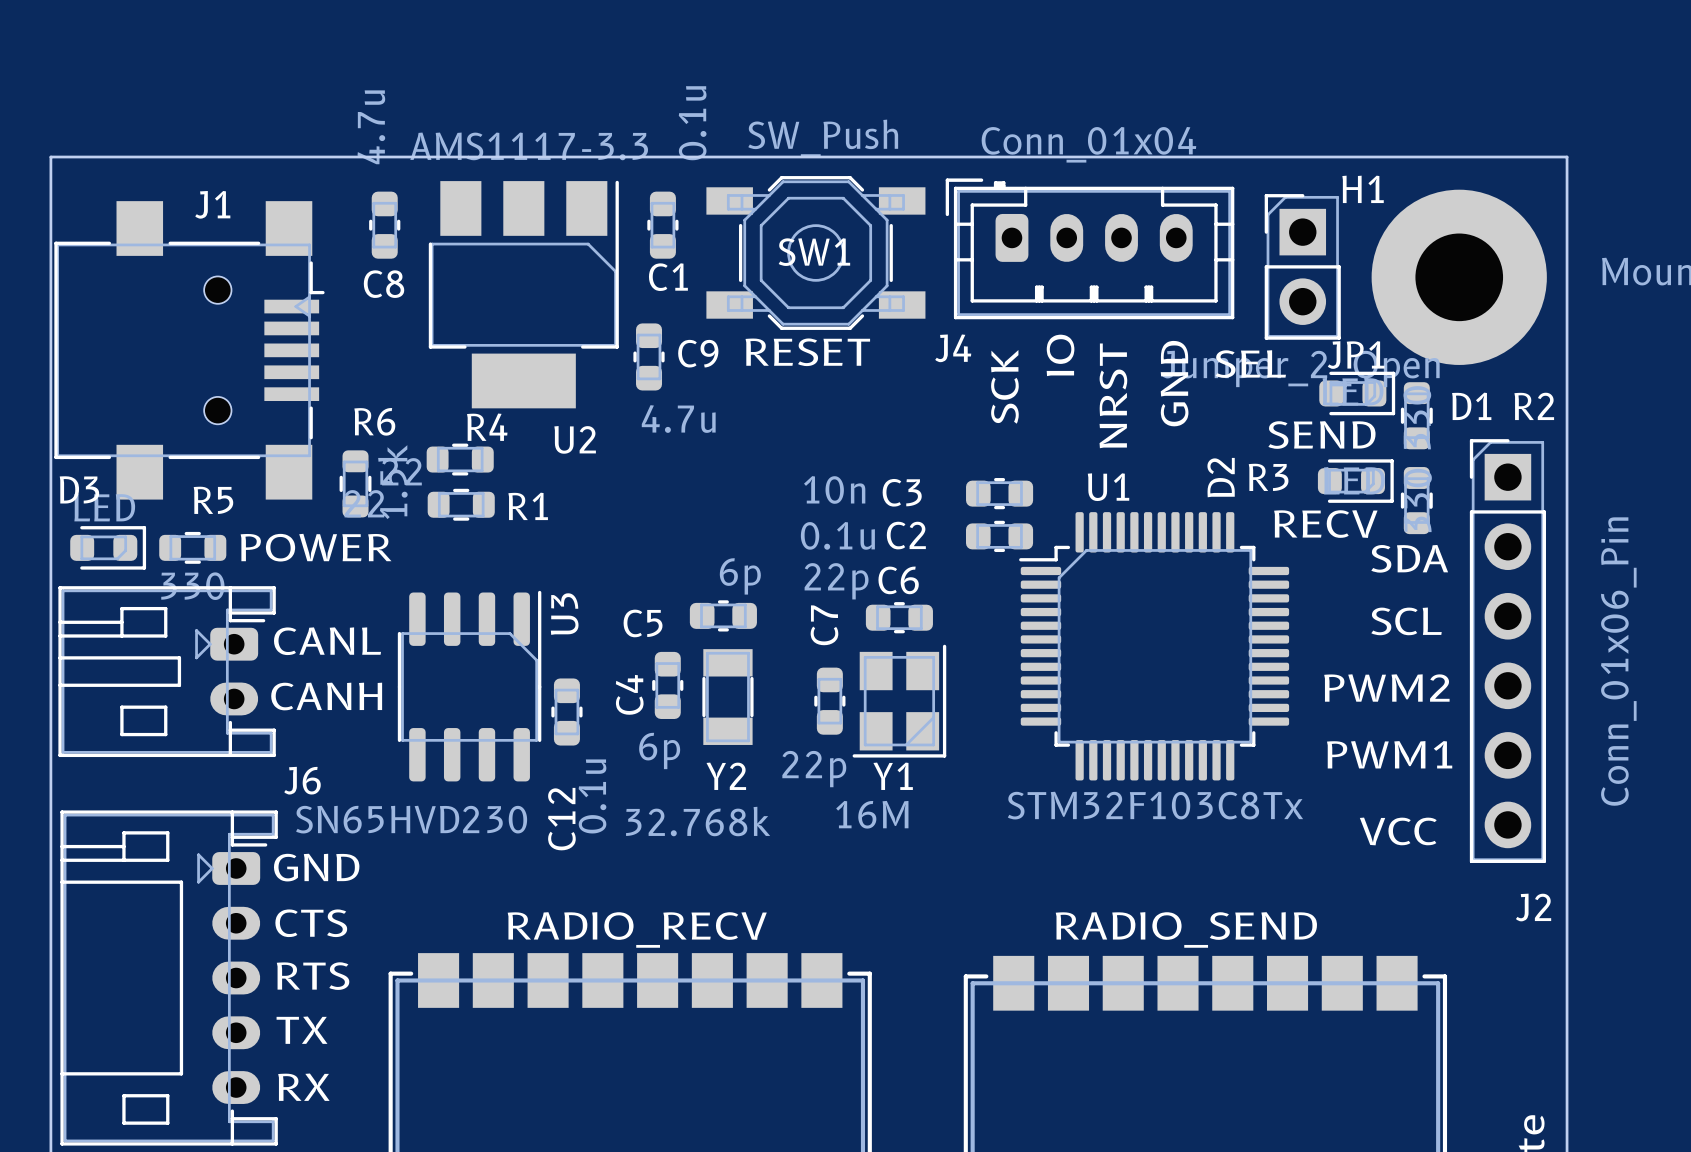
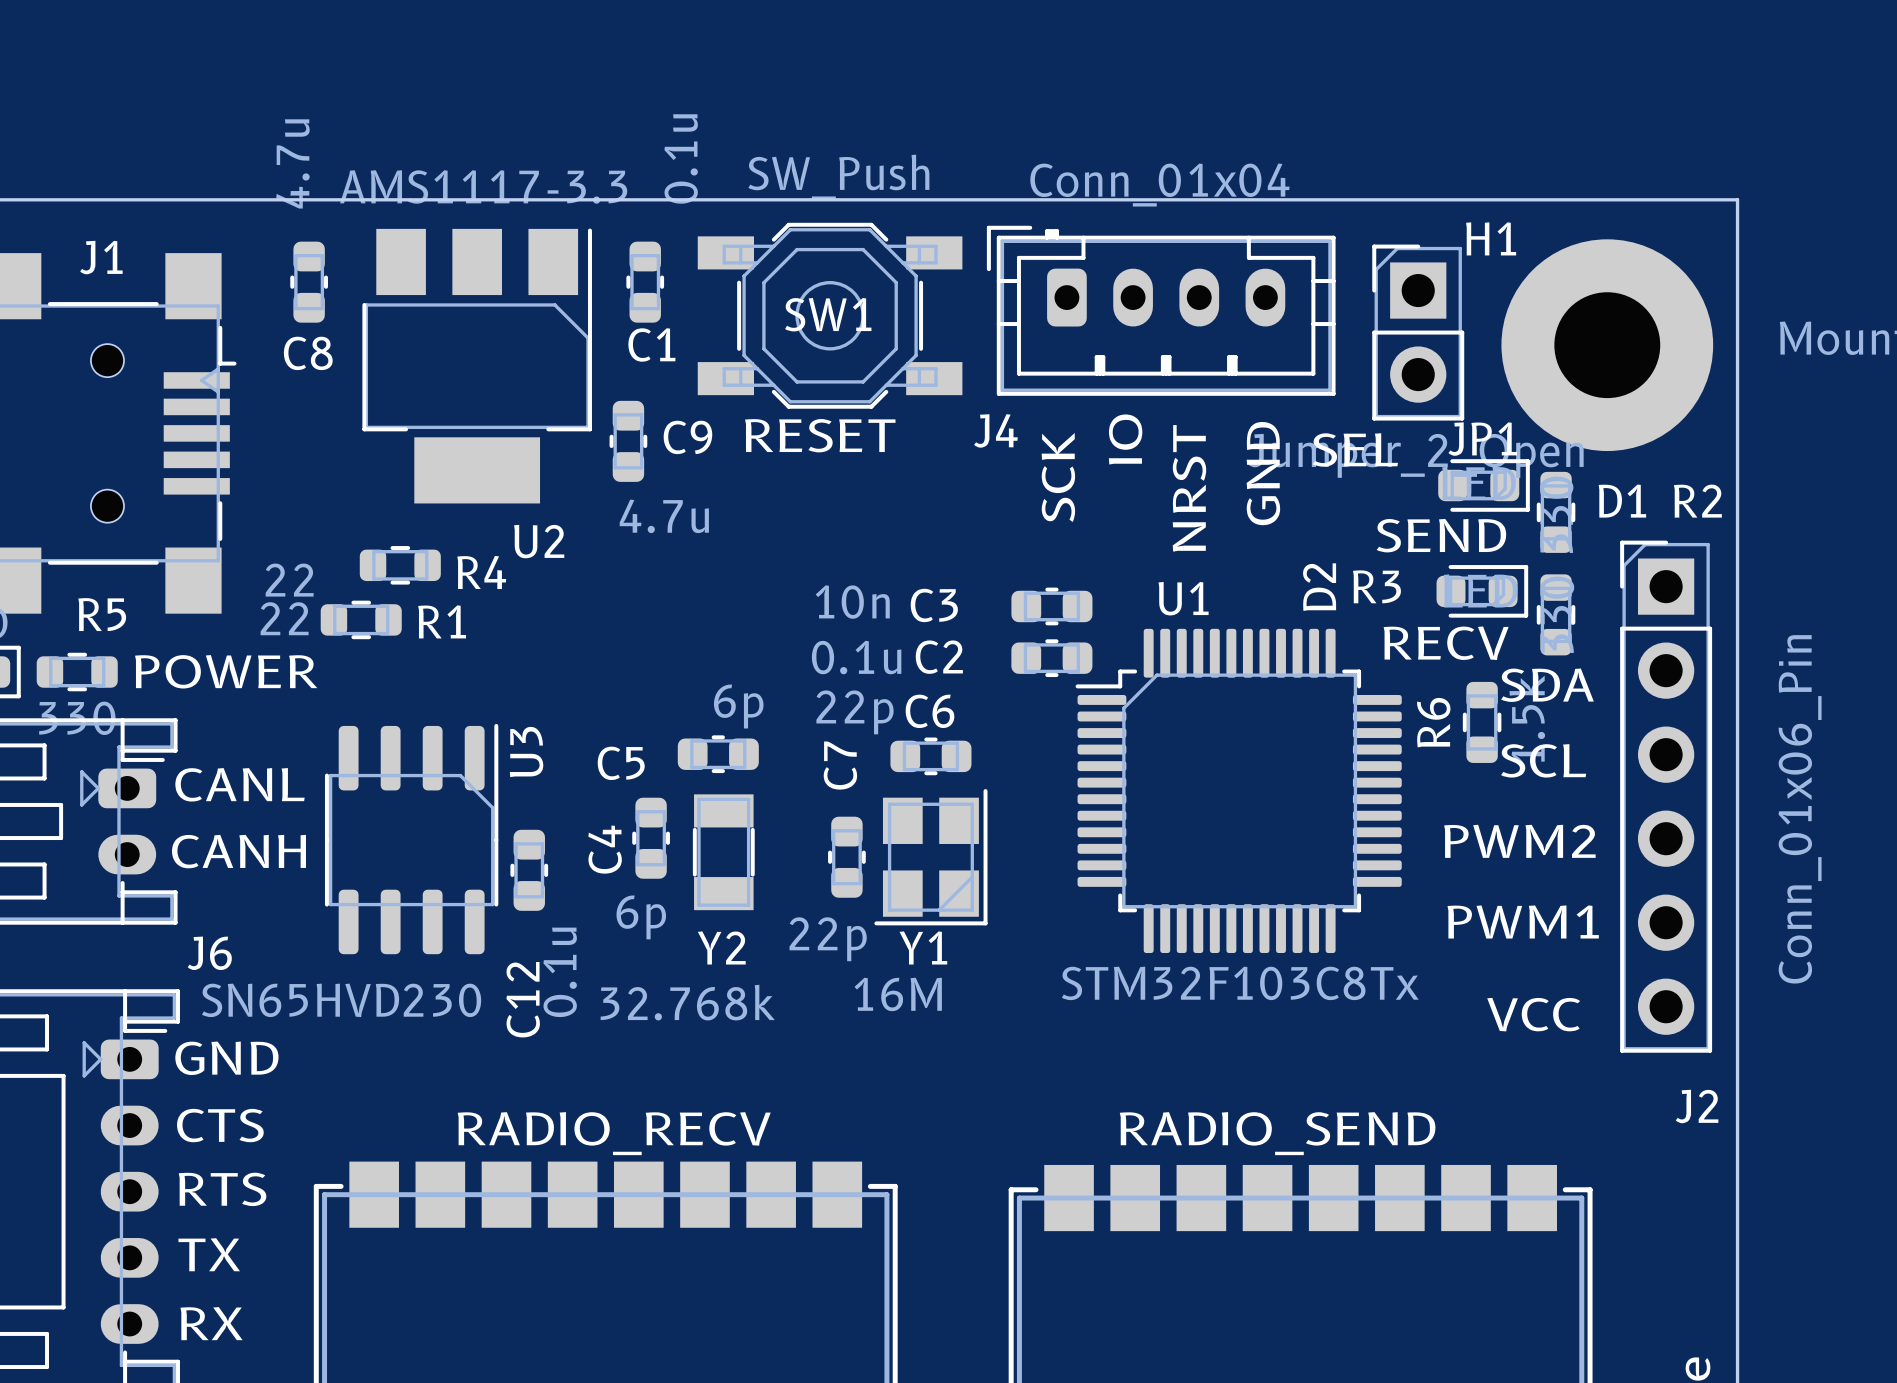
R6 name rotation: 0° (374, 421) -> 90° counterclockwise (1433, 722)
R6 name position: R6 (374, 421) -> R6 (1433, 722)
R4 name position: R4 (487, 427) -> R4 (481, 572)
R6 position: (355, 483) -> (1482, 722)
R1 position: (461, 504) -> (361, 619)

